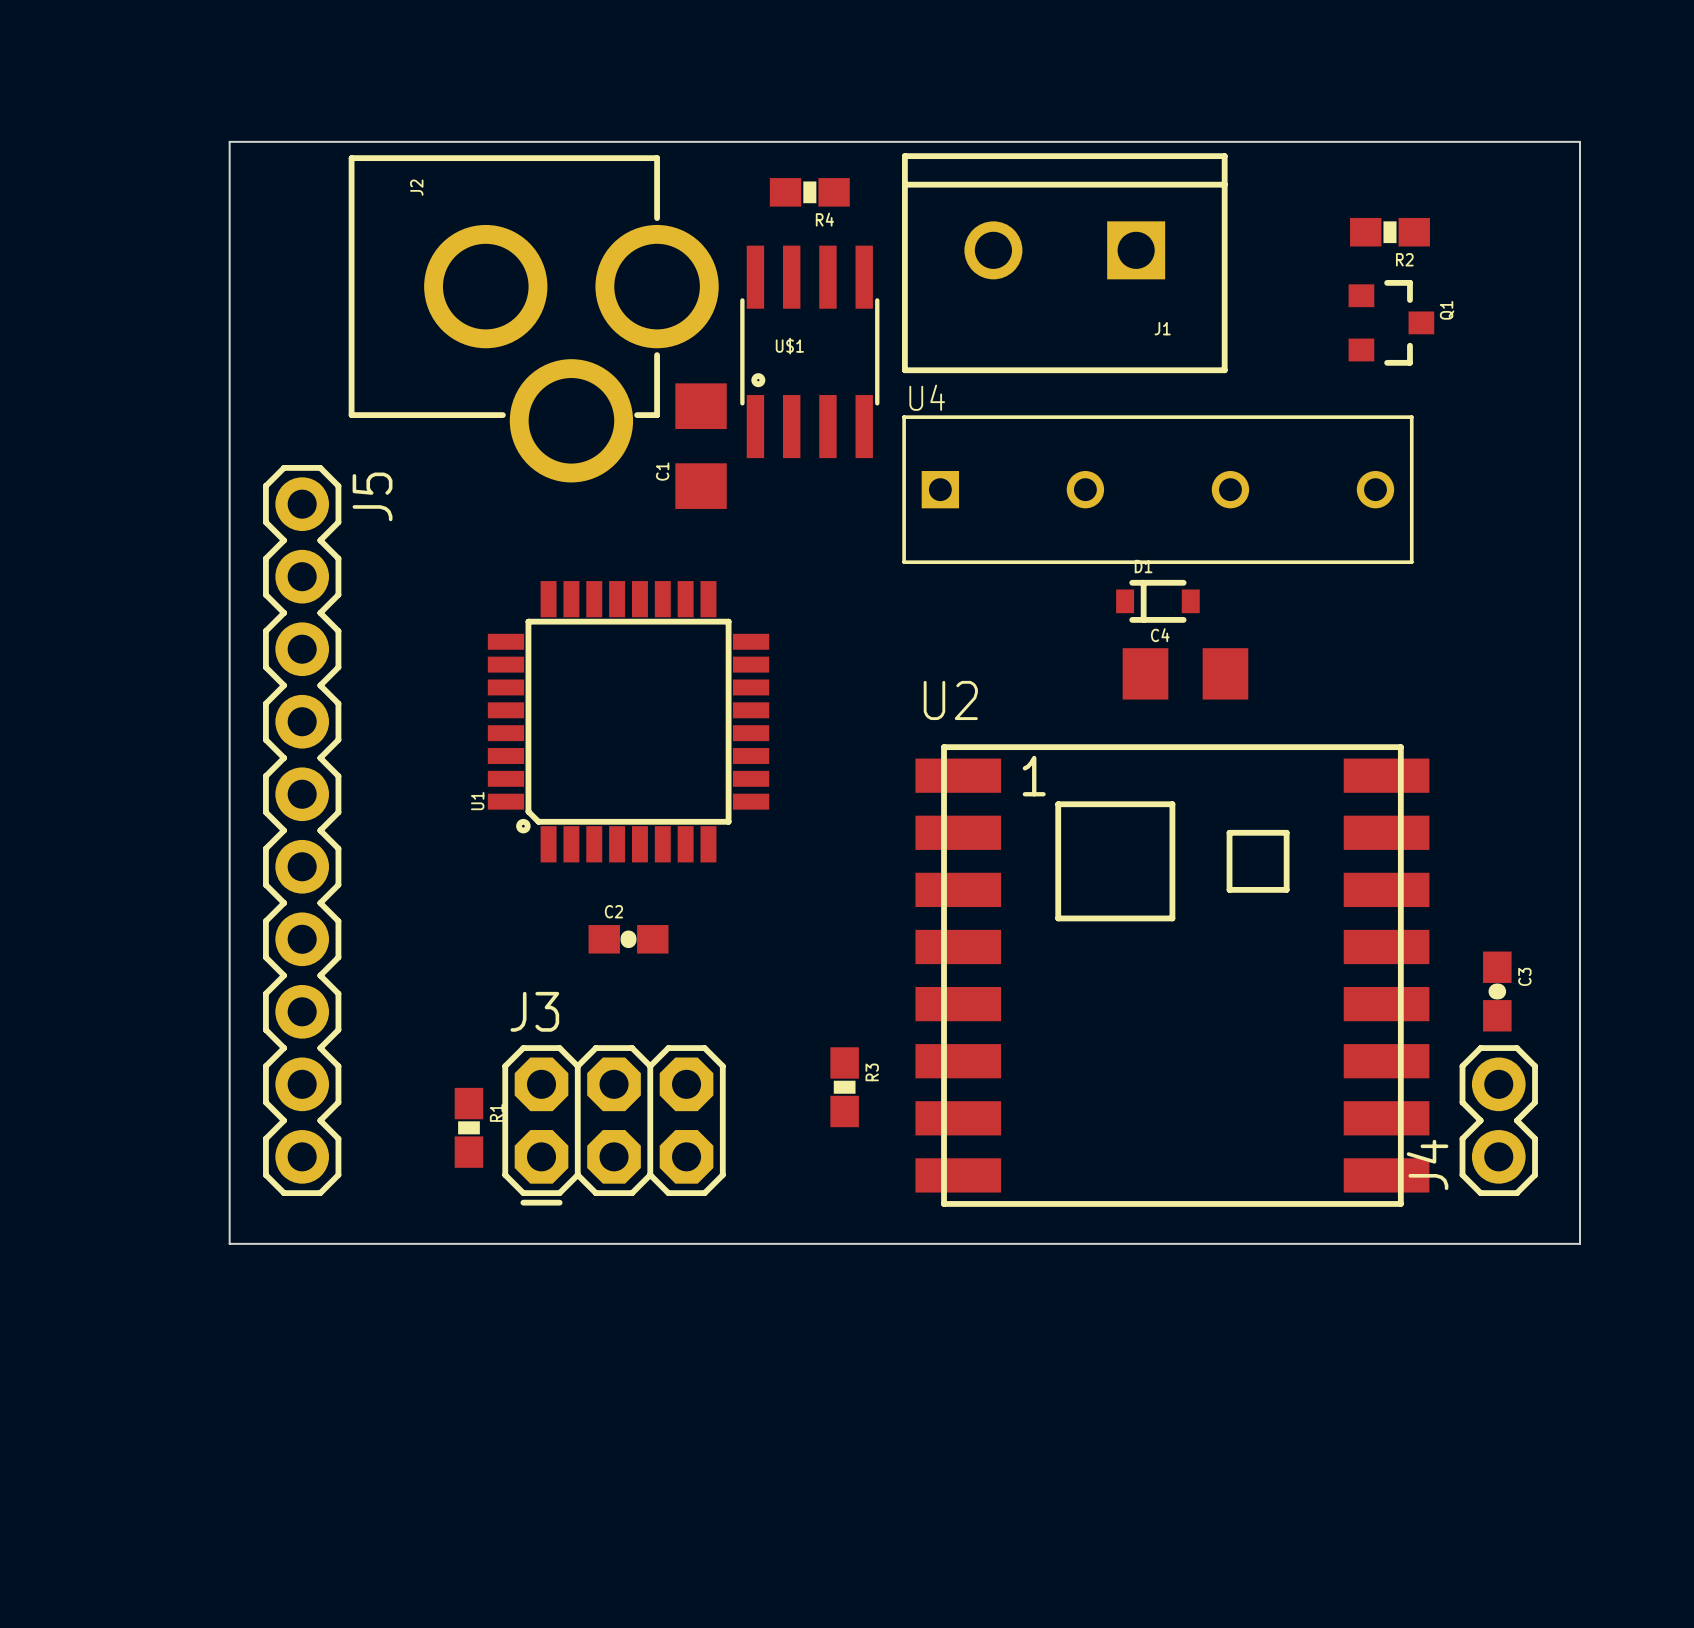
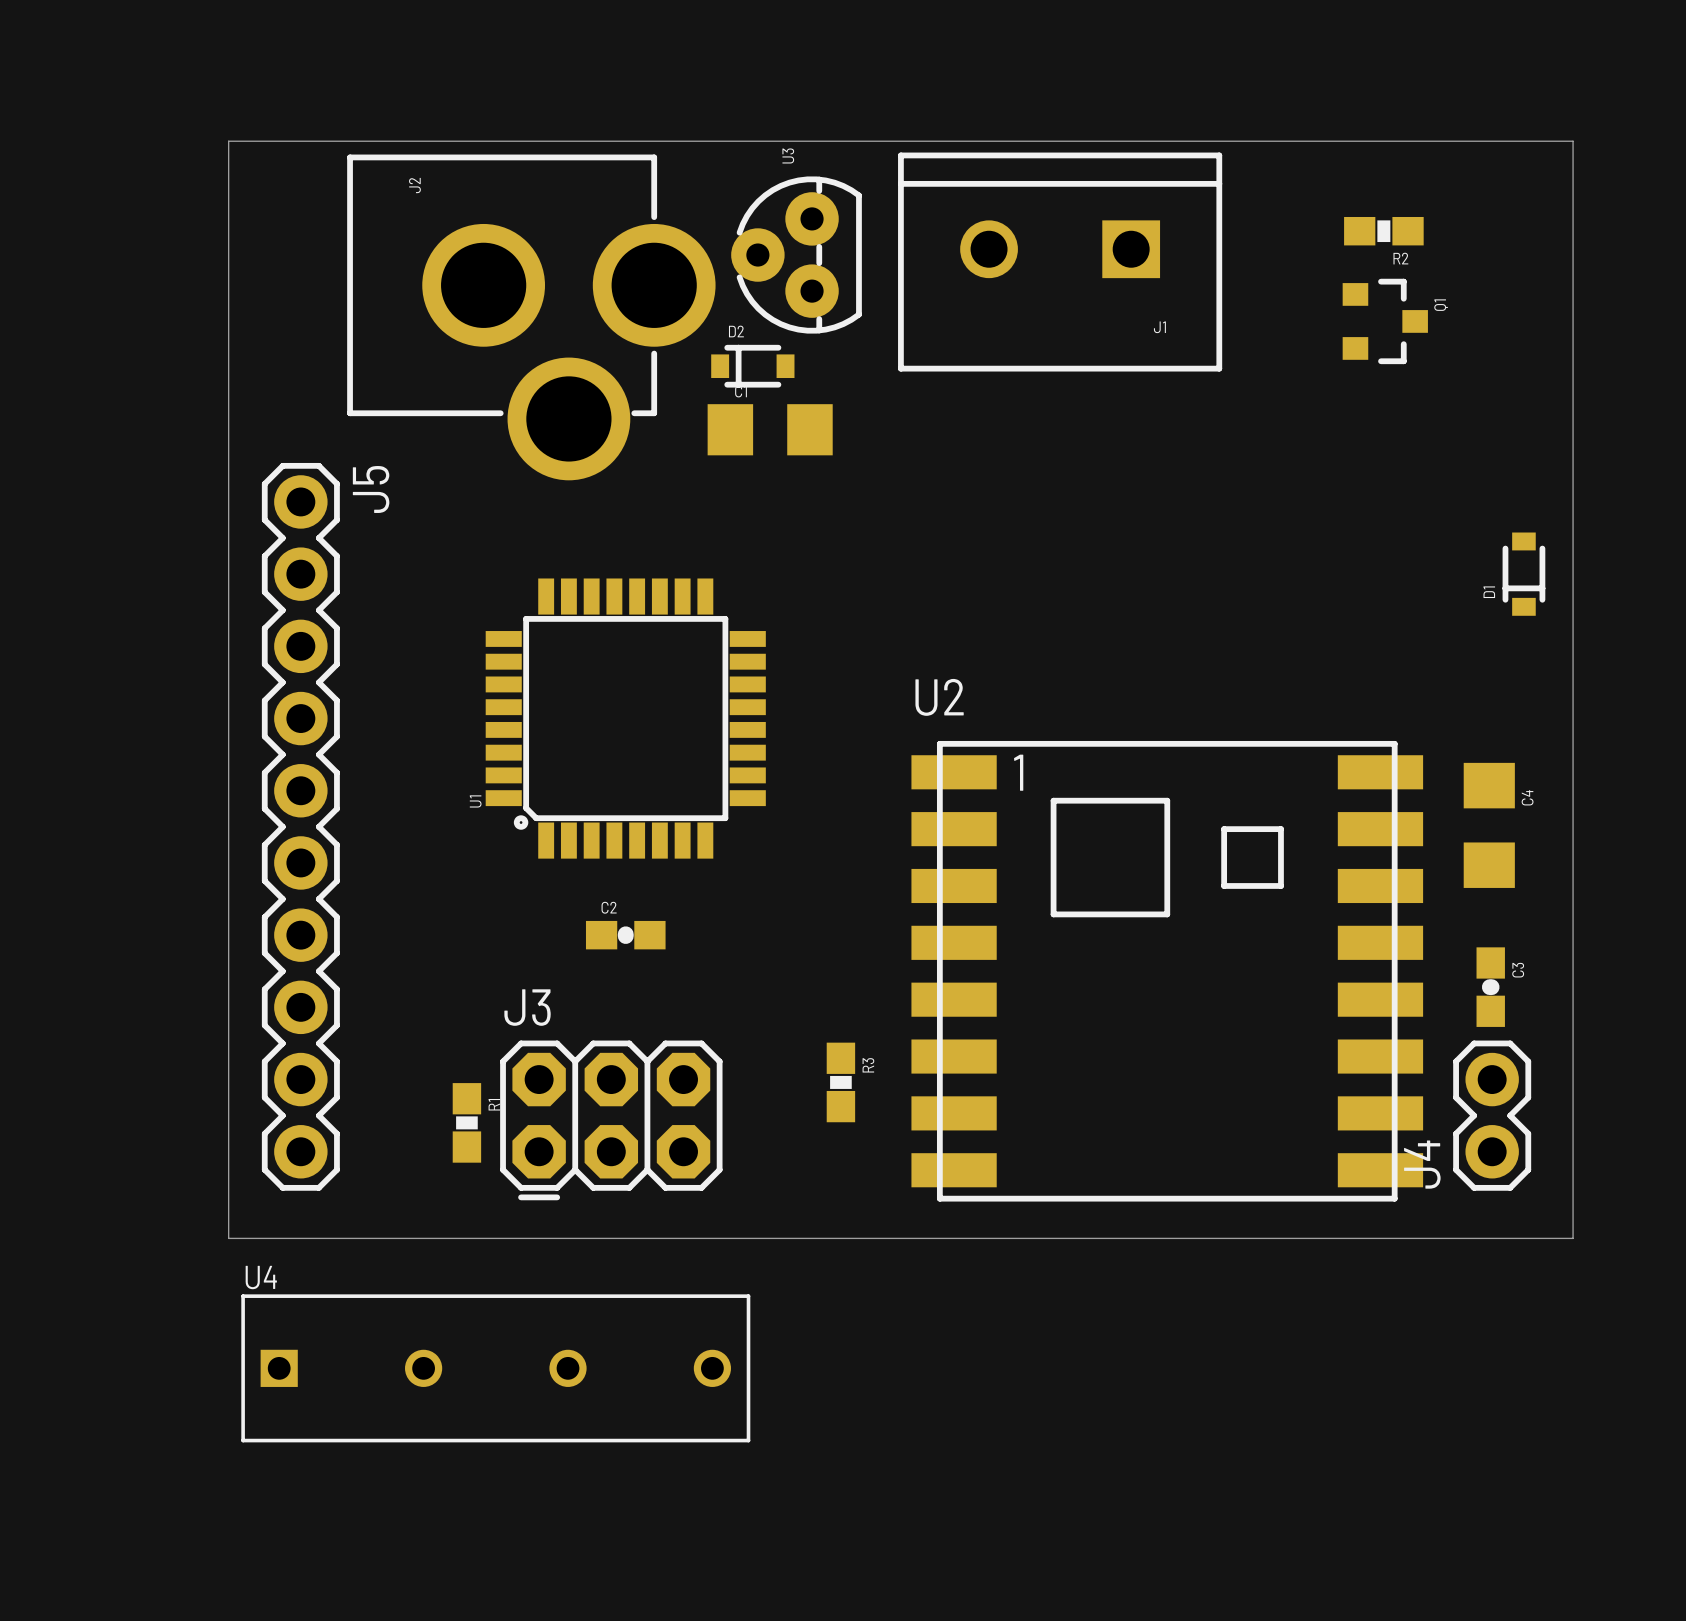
R4: (809, 192) -> none
U3: none -> (796, 255)
U$1: (809, 351) -> none
D2: none -> (752, 366)
C1 rotation: 0° (701, 446) -> 90° clockwise (770, 429)
U4 position: (1157, 489) -> (495, 1368)
D1 rotation: 0° (1157, 601) -> 90° counterclockwise (1523, 574)
D1 position: (1157, 601) -> (1523, 574)
C4 rotation: 0° (1185, 673) -> 90° clockwise (1489, 825)
C4 position: (1185, 673) -> (1489, 825)

